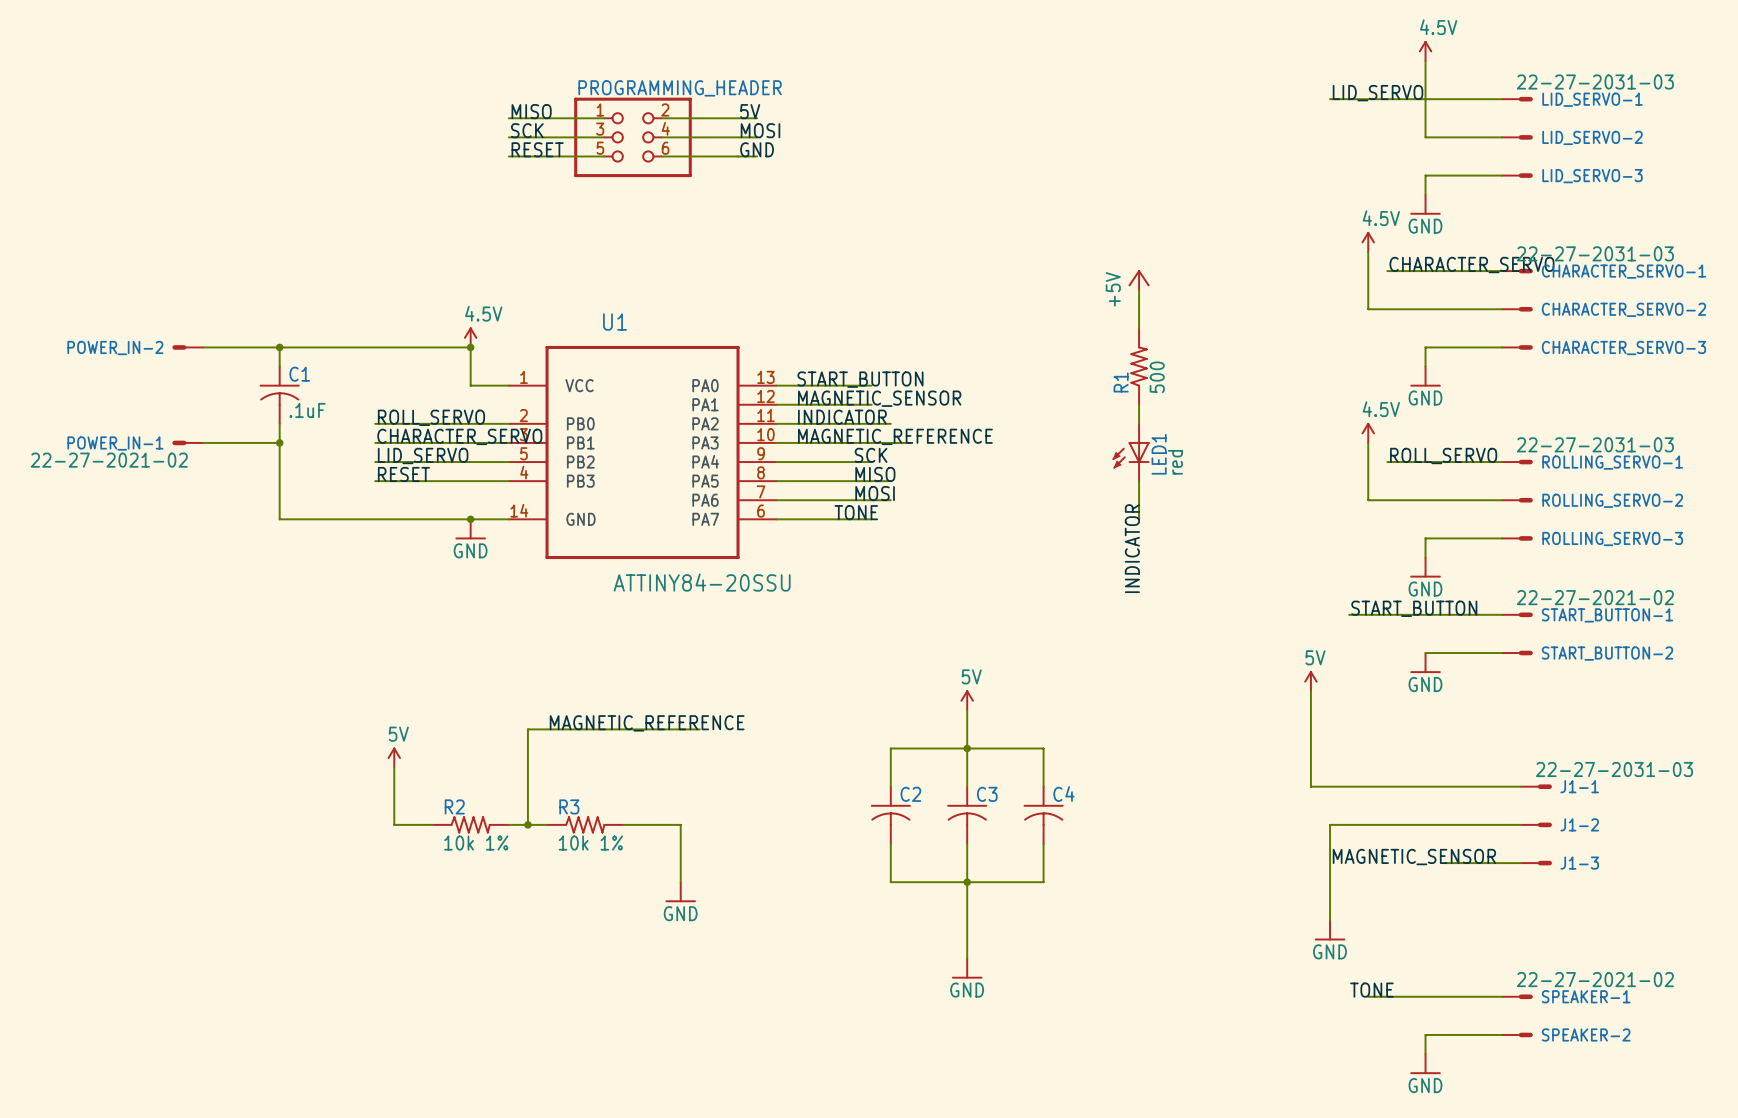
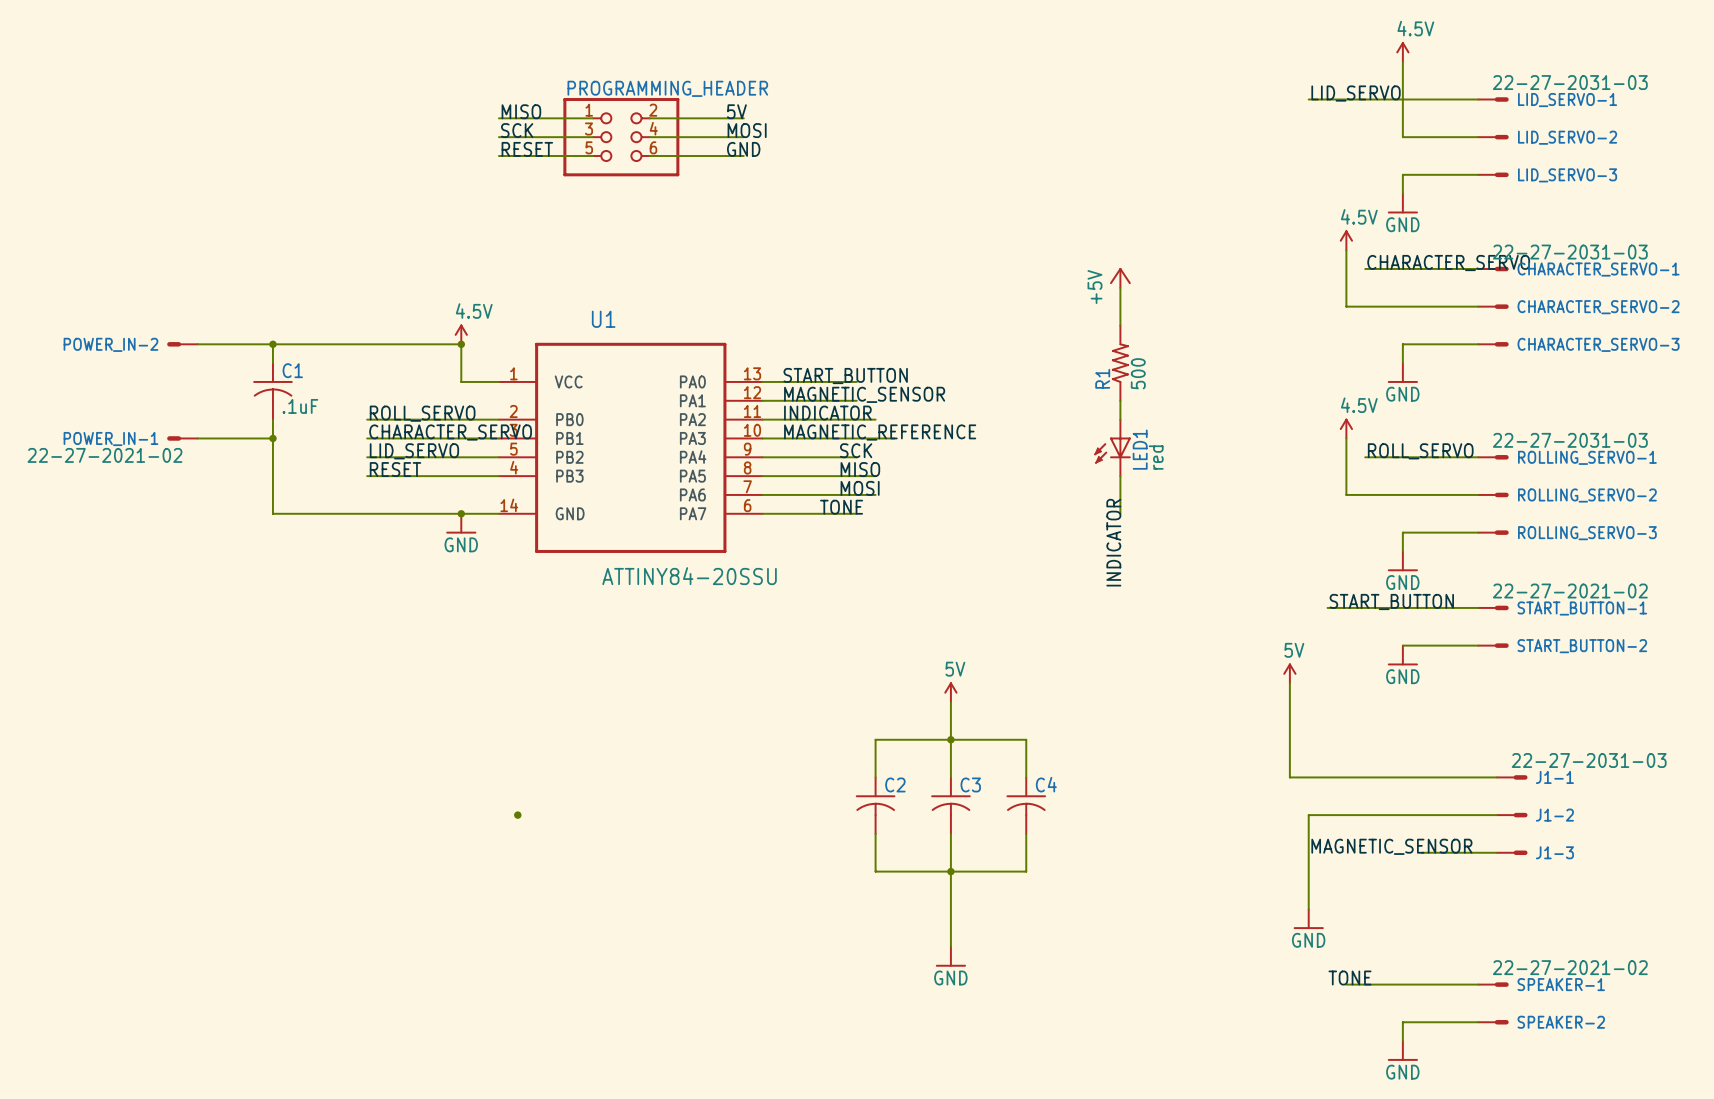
label: MAGNETIC_REFERENCE (647, 723) -> none
wire: (699, 729) (527, 729) (527, 824) -> none
power symbol: 5V (394, 757) -> none
wire: (394, 767) (394, 824) (432, 824) -> none
R2: 10k 1% (470, 824) -> none
wire: (508, 824) (547, 824) -> none
R3: 10k 1% (585, 824) -> none
wire: (623, 824) (680, 824) (680, 882) -> none
power symbol: GND (680, 892) -> none

